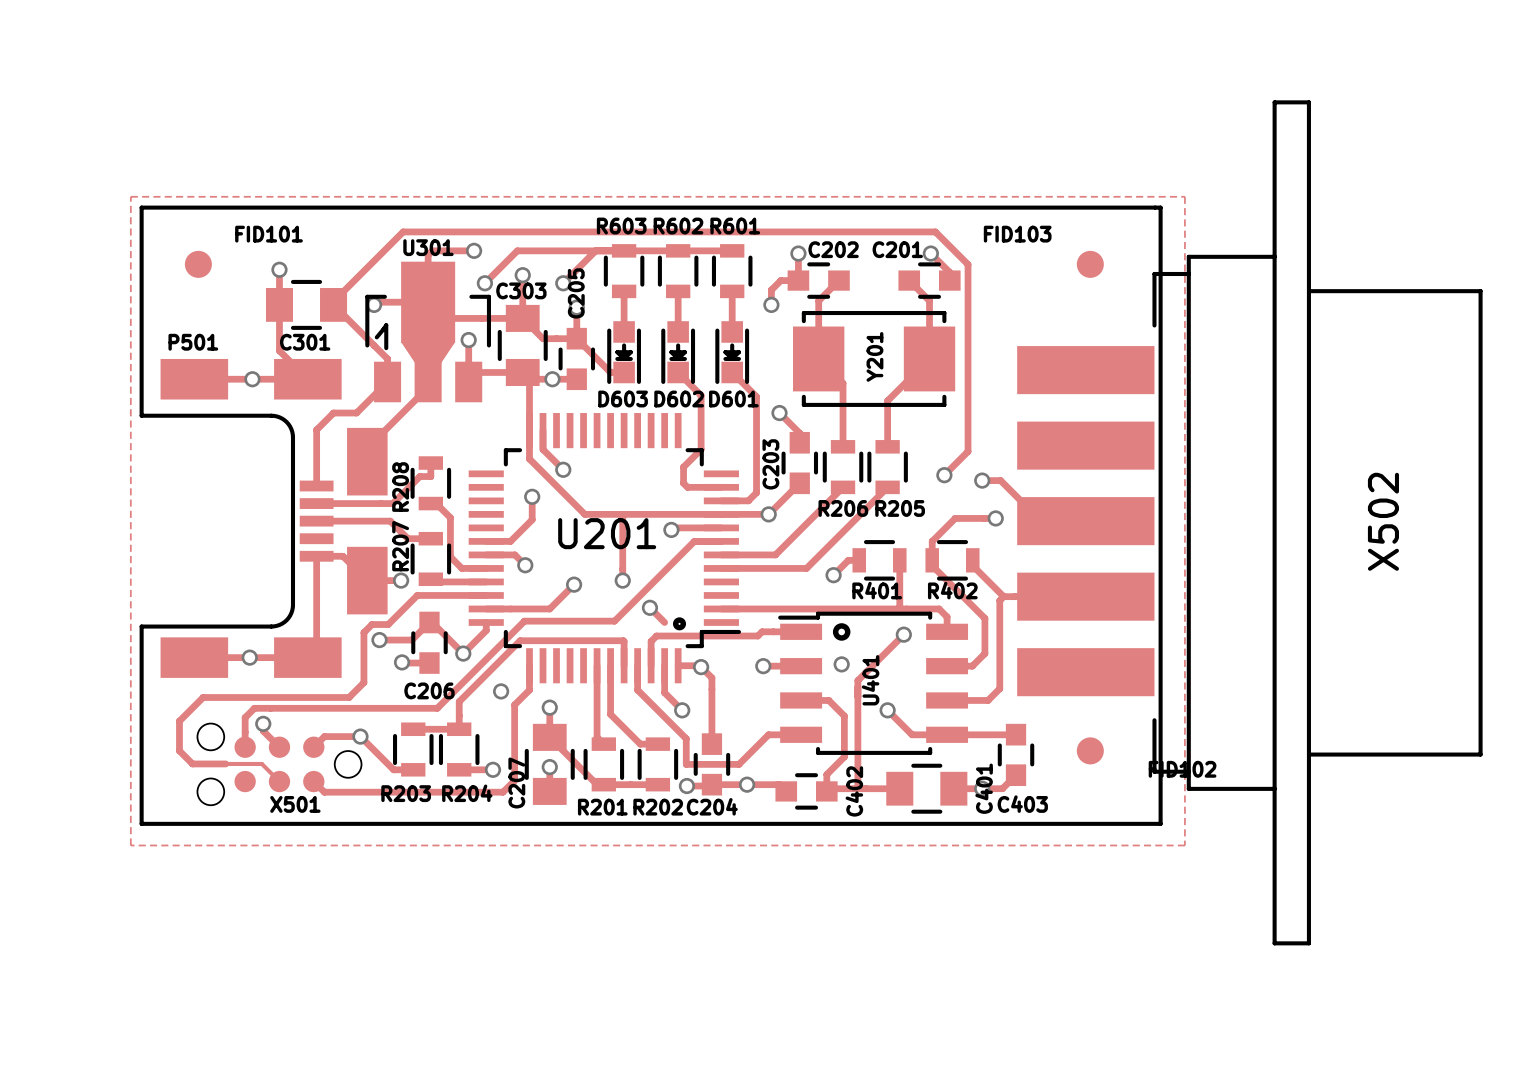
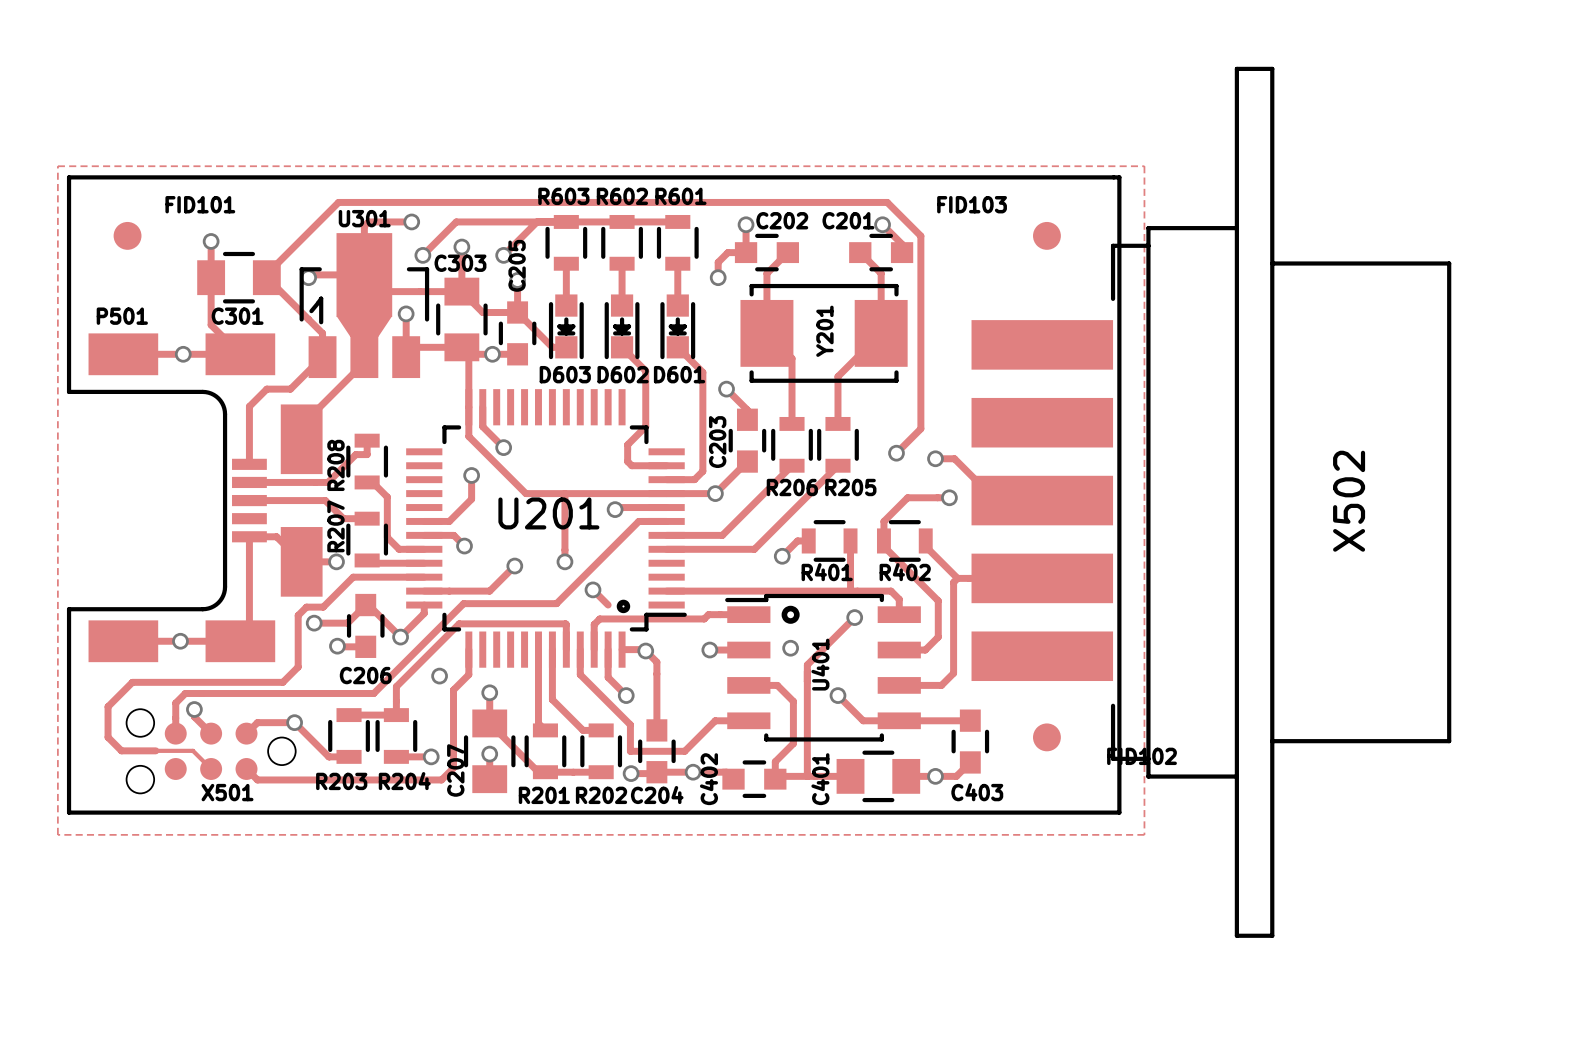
C401 name position: C401 (984, 788) -> C401 (820, 779)
C402 name position: C402 (854, 791) -> C402 (708, 779)

